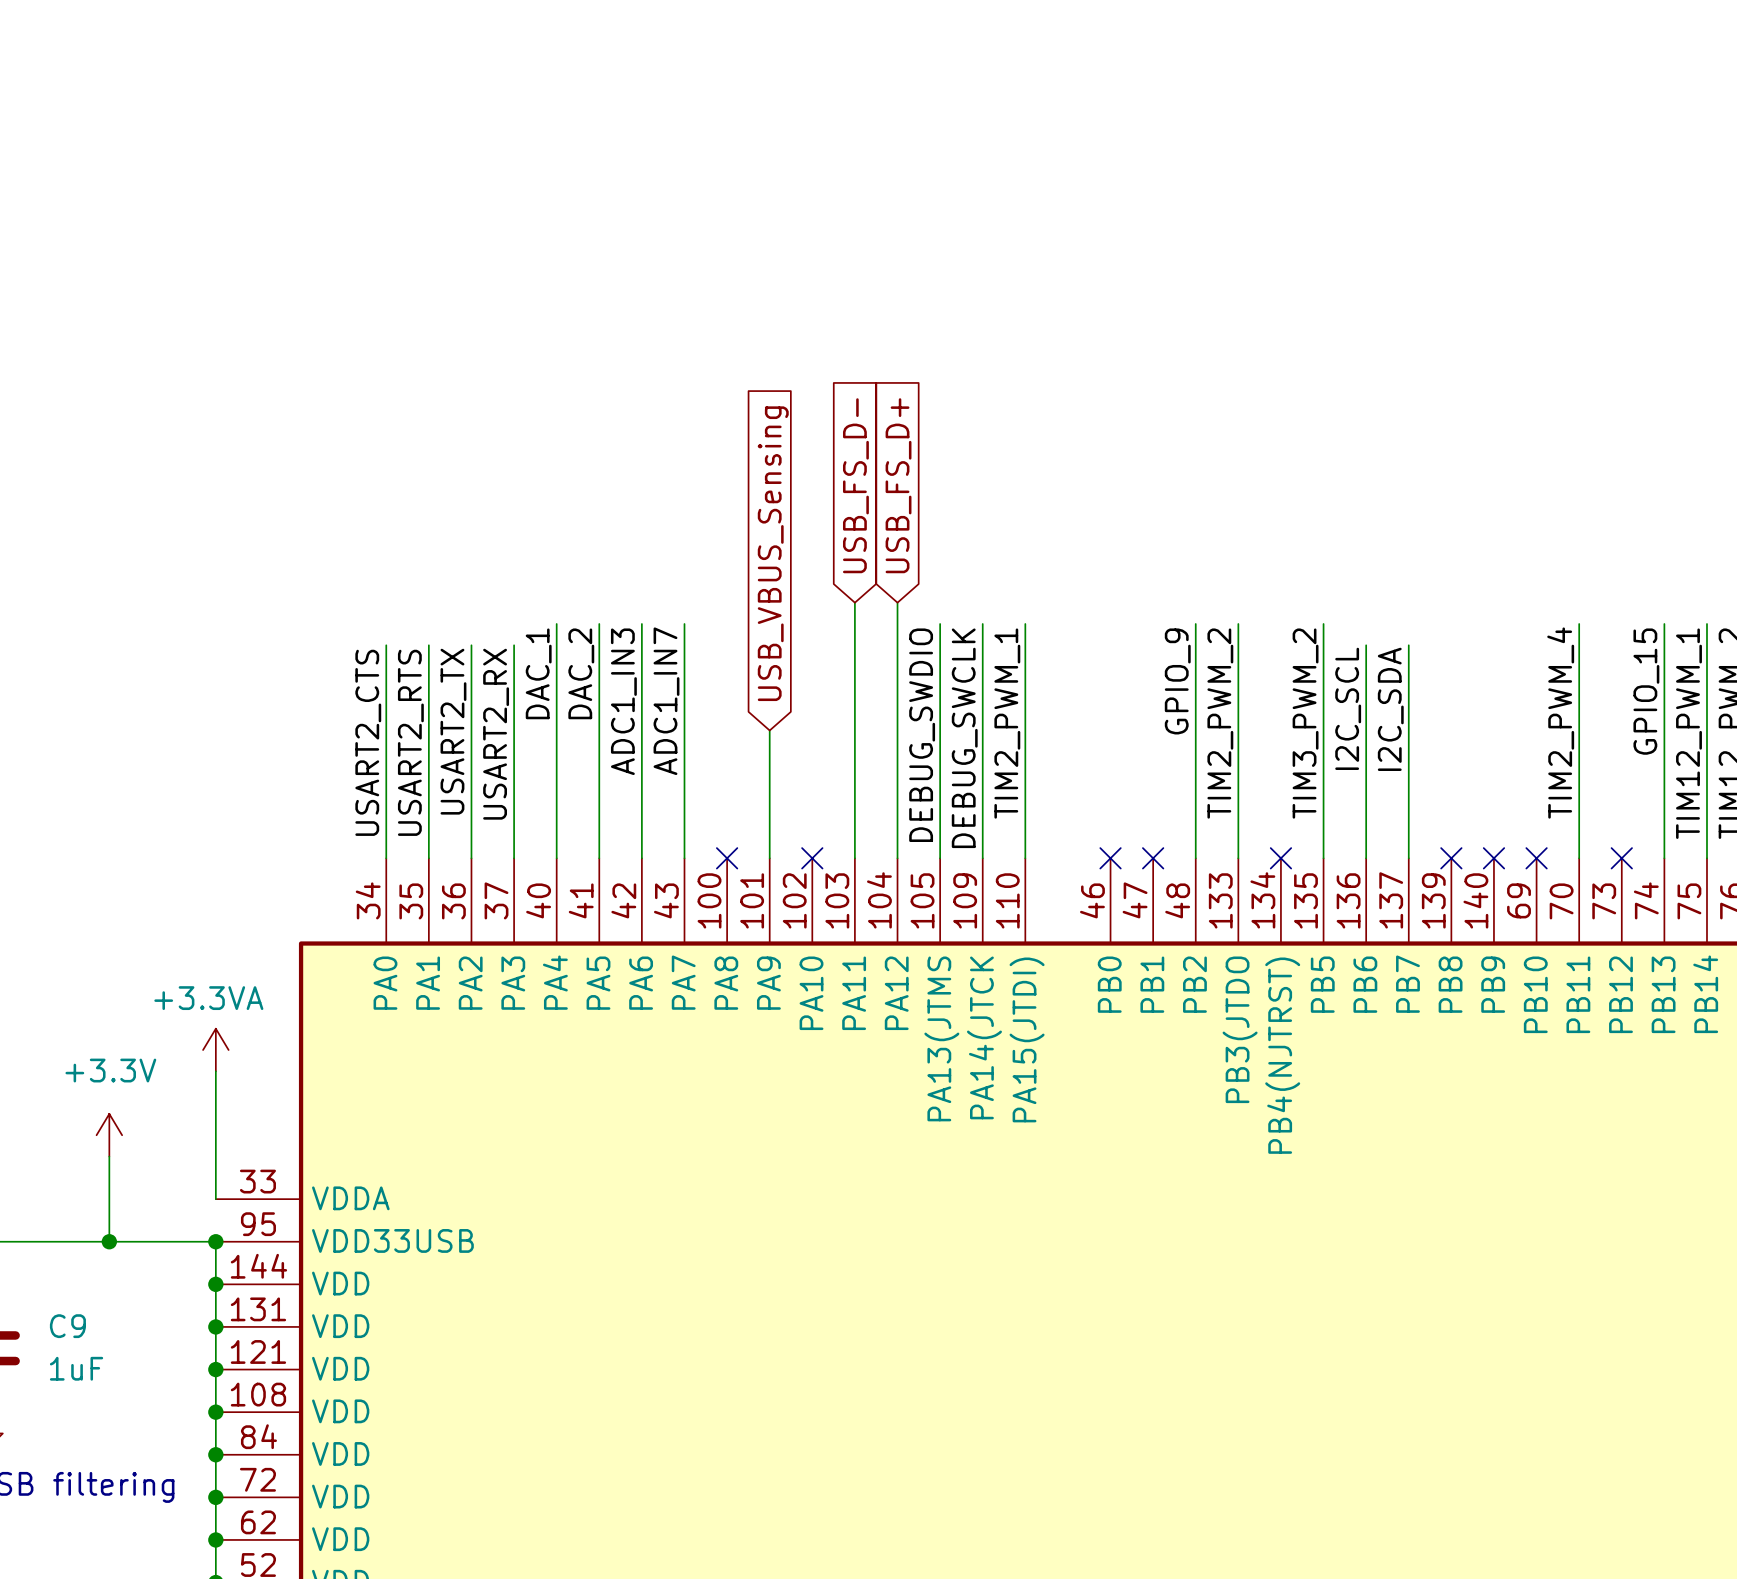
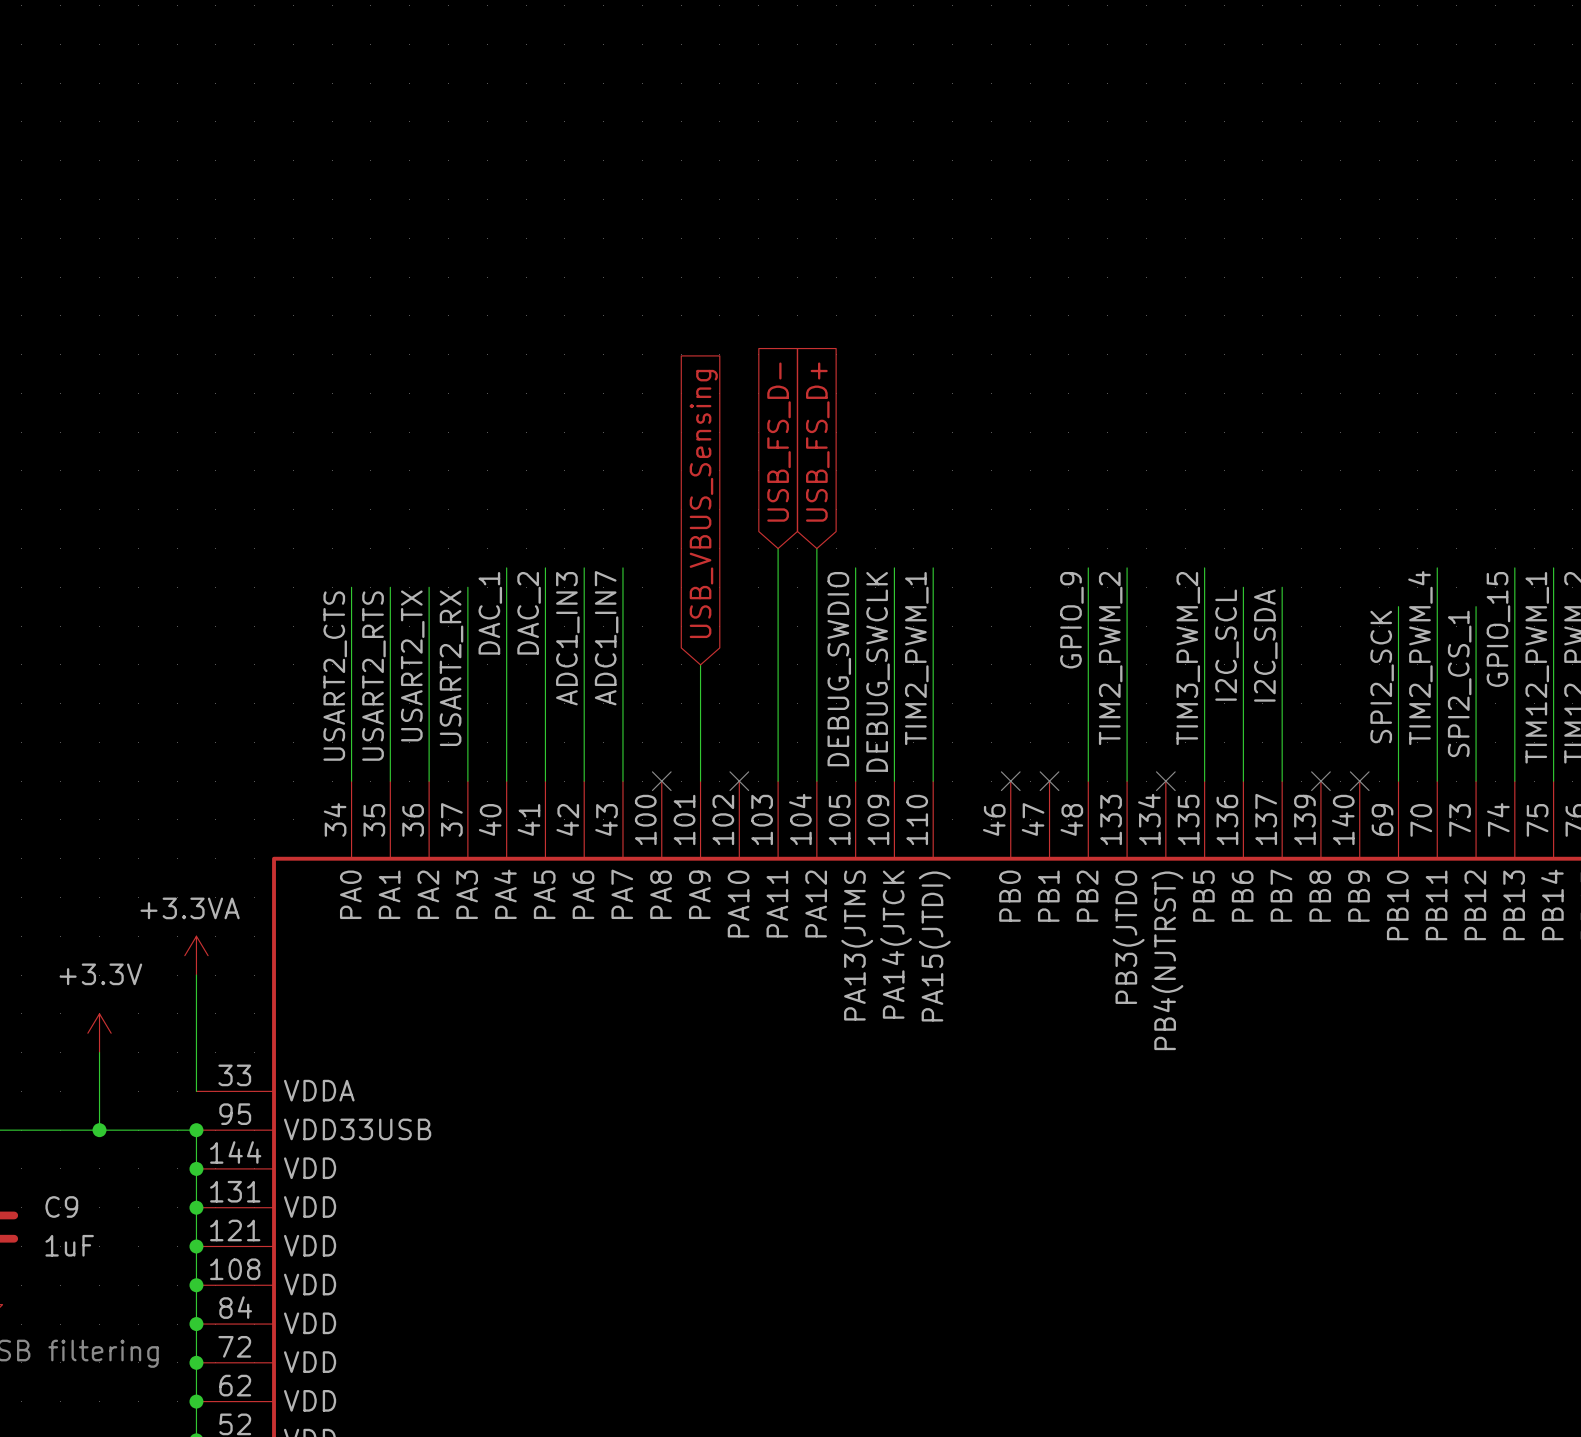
wire: none -> (1398, 606) (1398, 781)
wire: none -> (1476, 606) (1476, 781)
label: none -> SPI2_SCK (1382, 677)
label: none -> SPI2_CS_1 (1459, 683)
no-connect mark: (1536, 858) -> none
no-connect mark: (1621, 858) -> none

